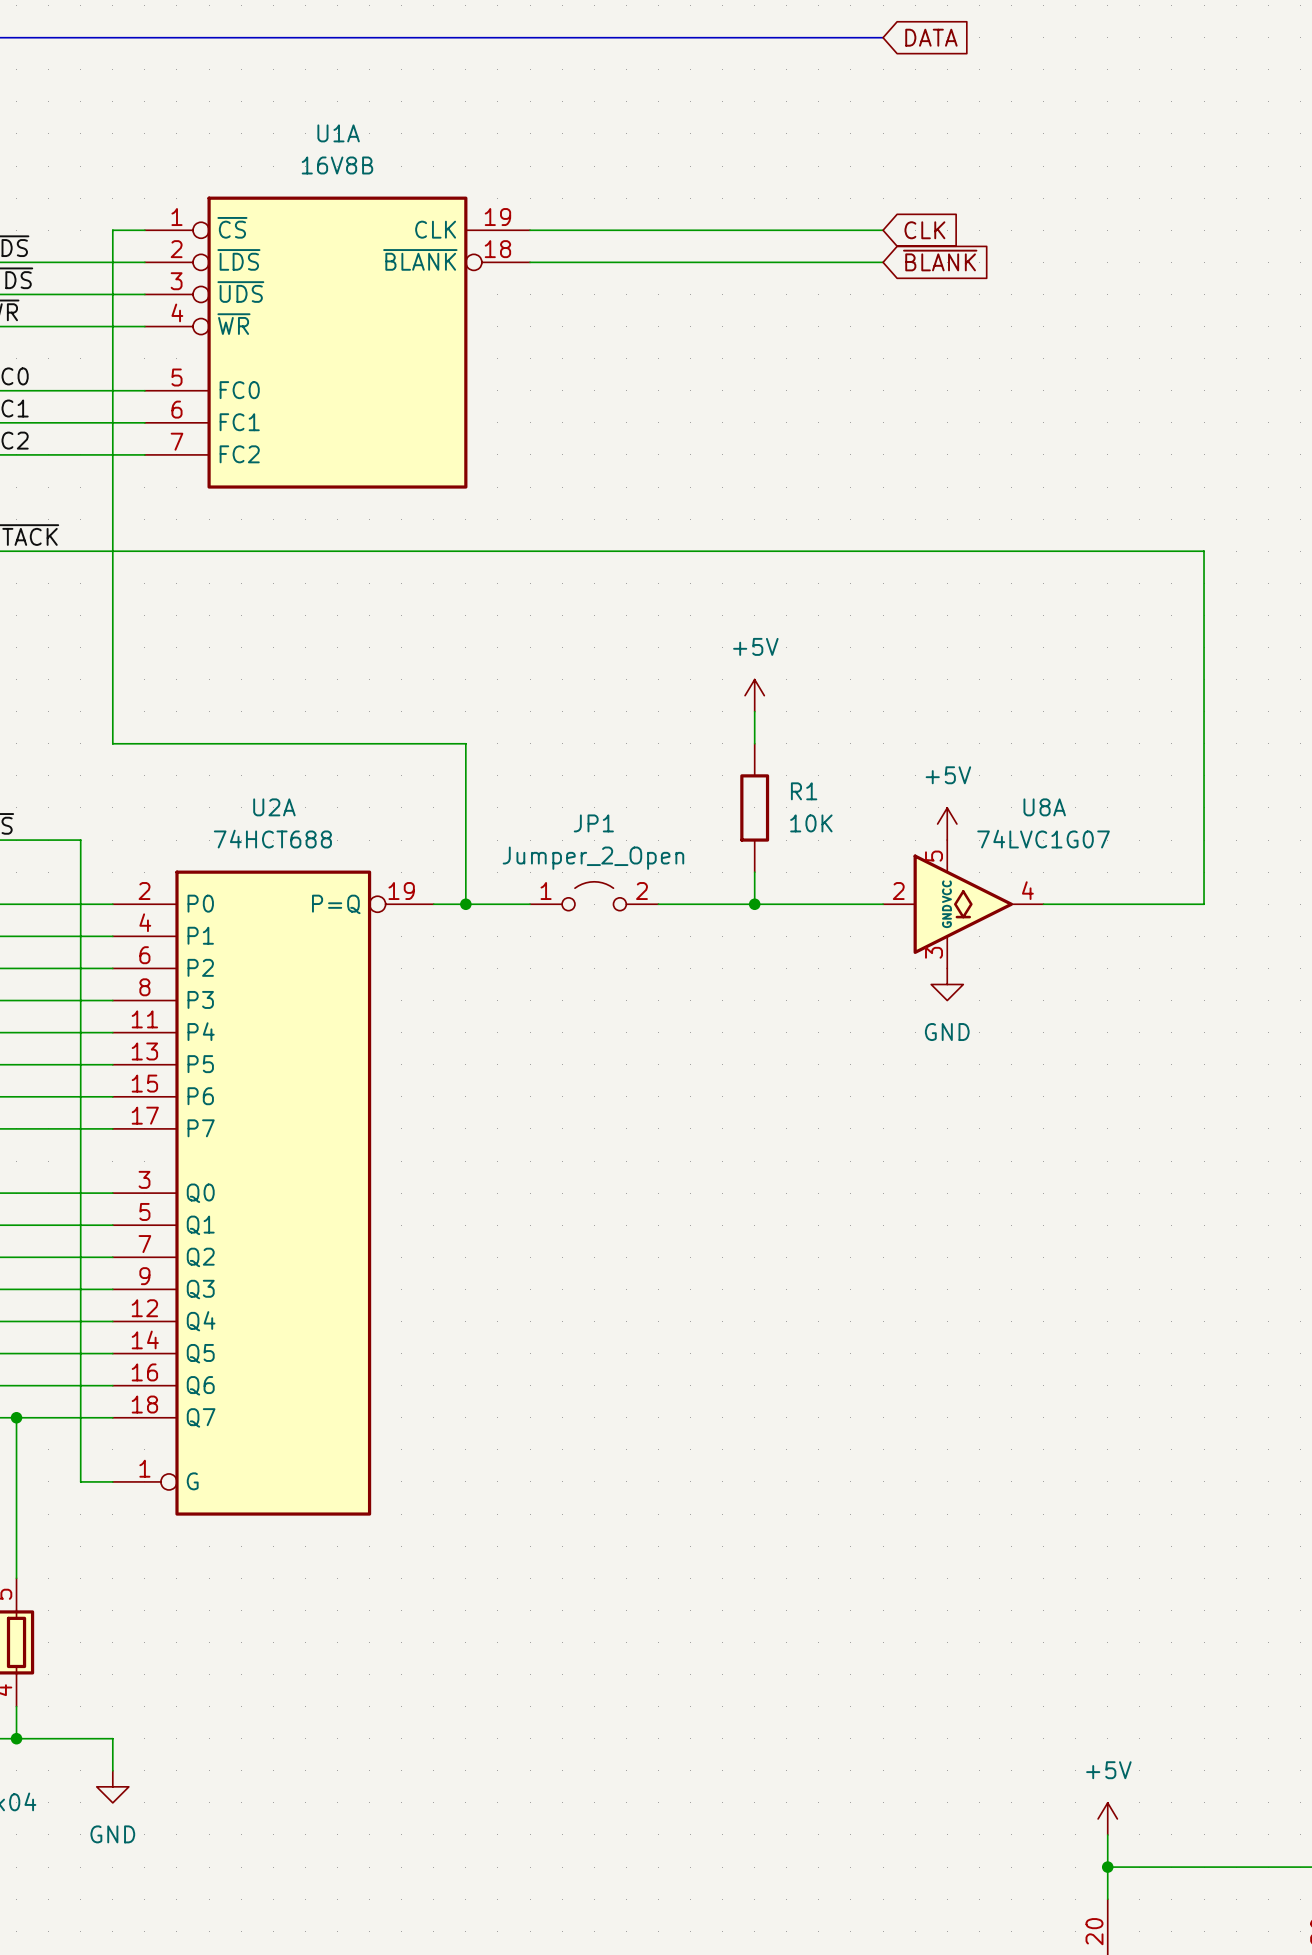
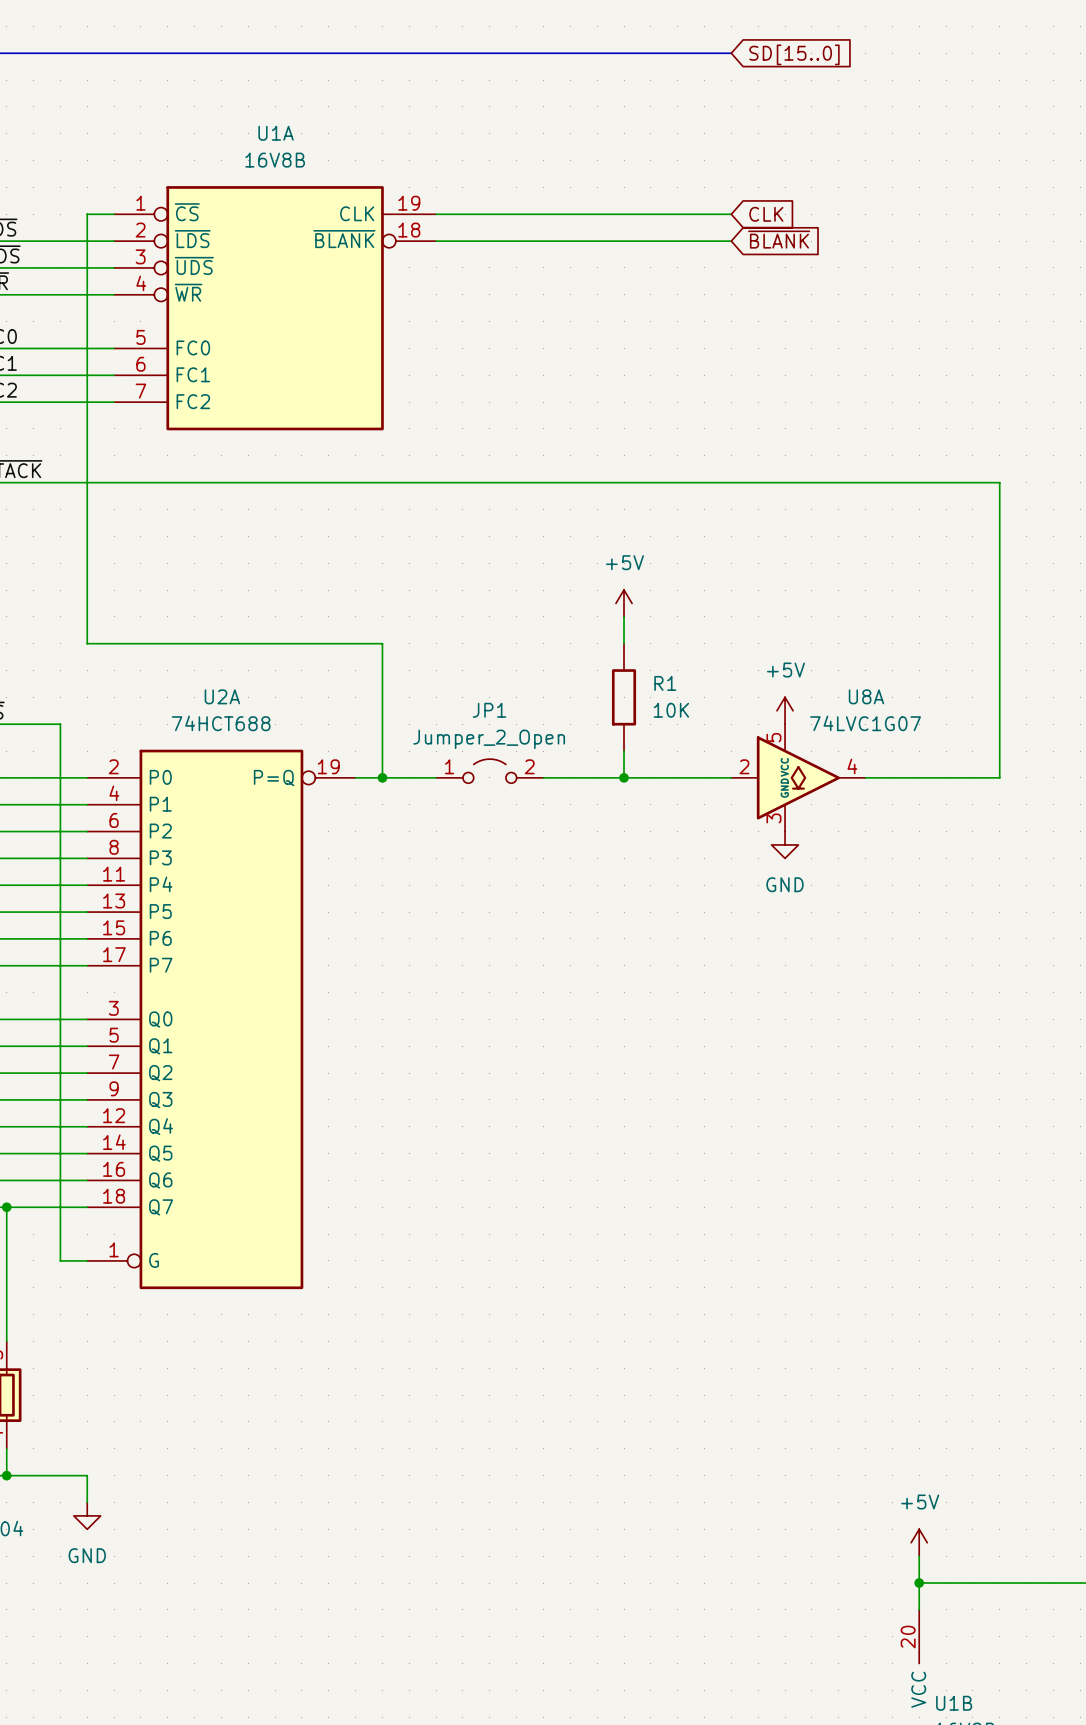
global label: DATA (931, 37) -> SD[15..0] (794, 54)

